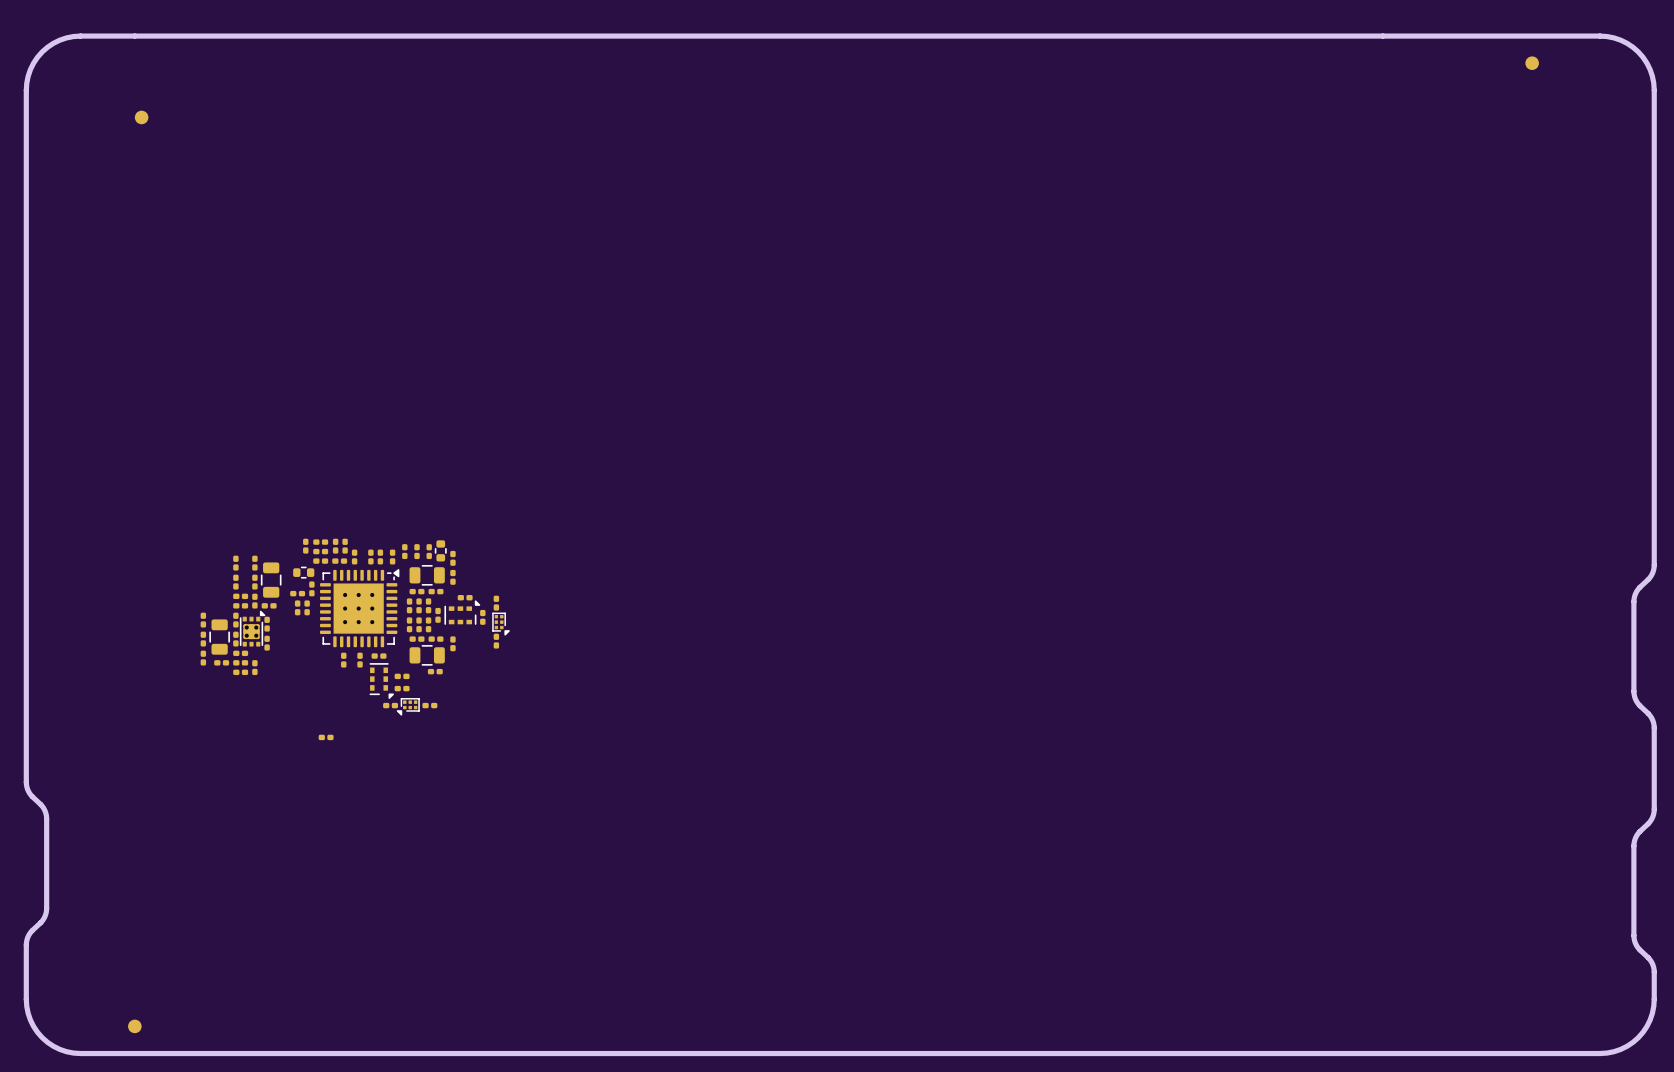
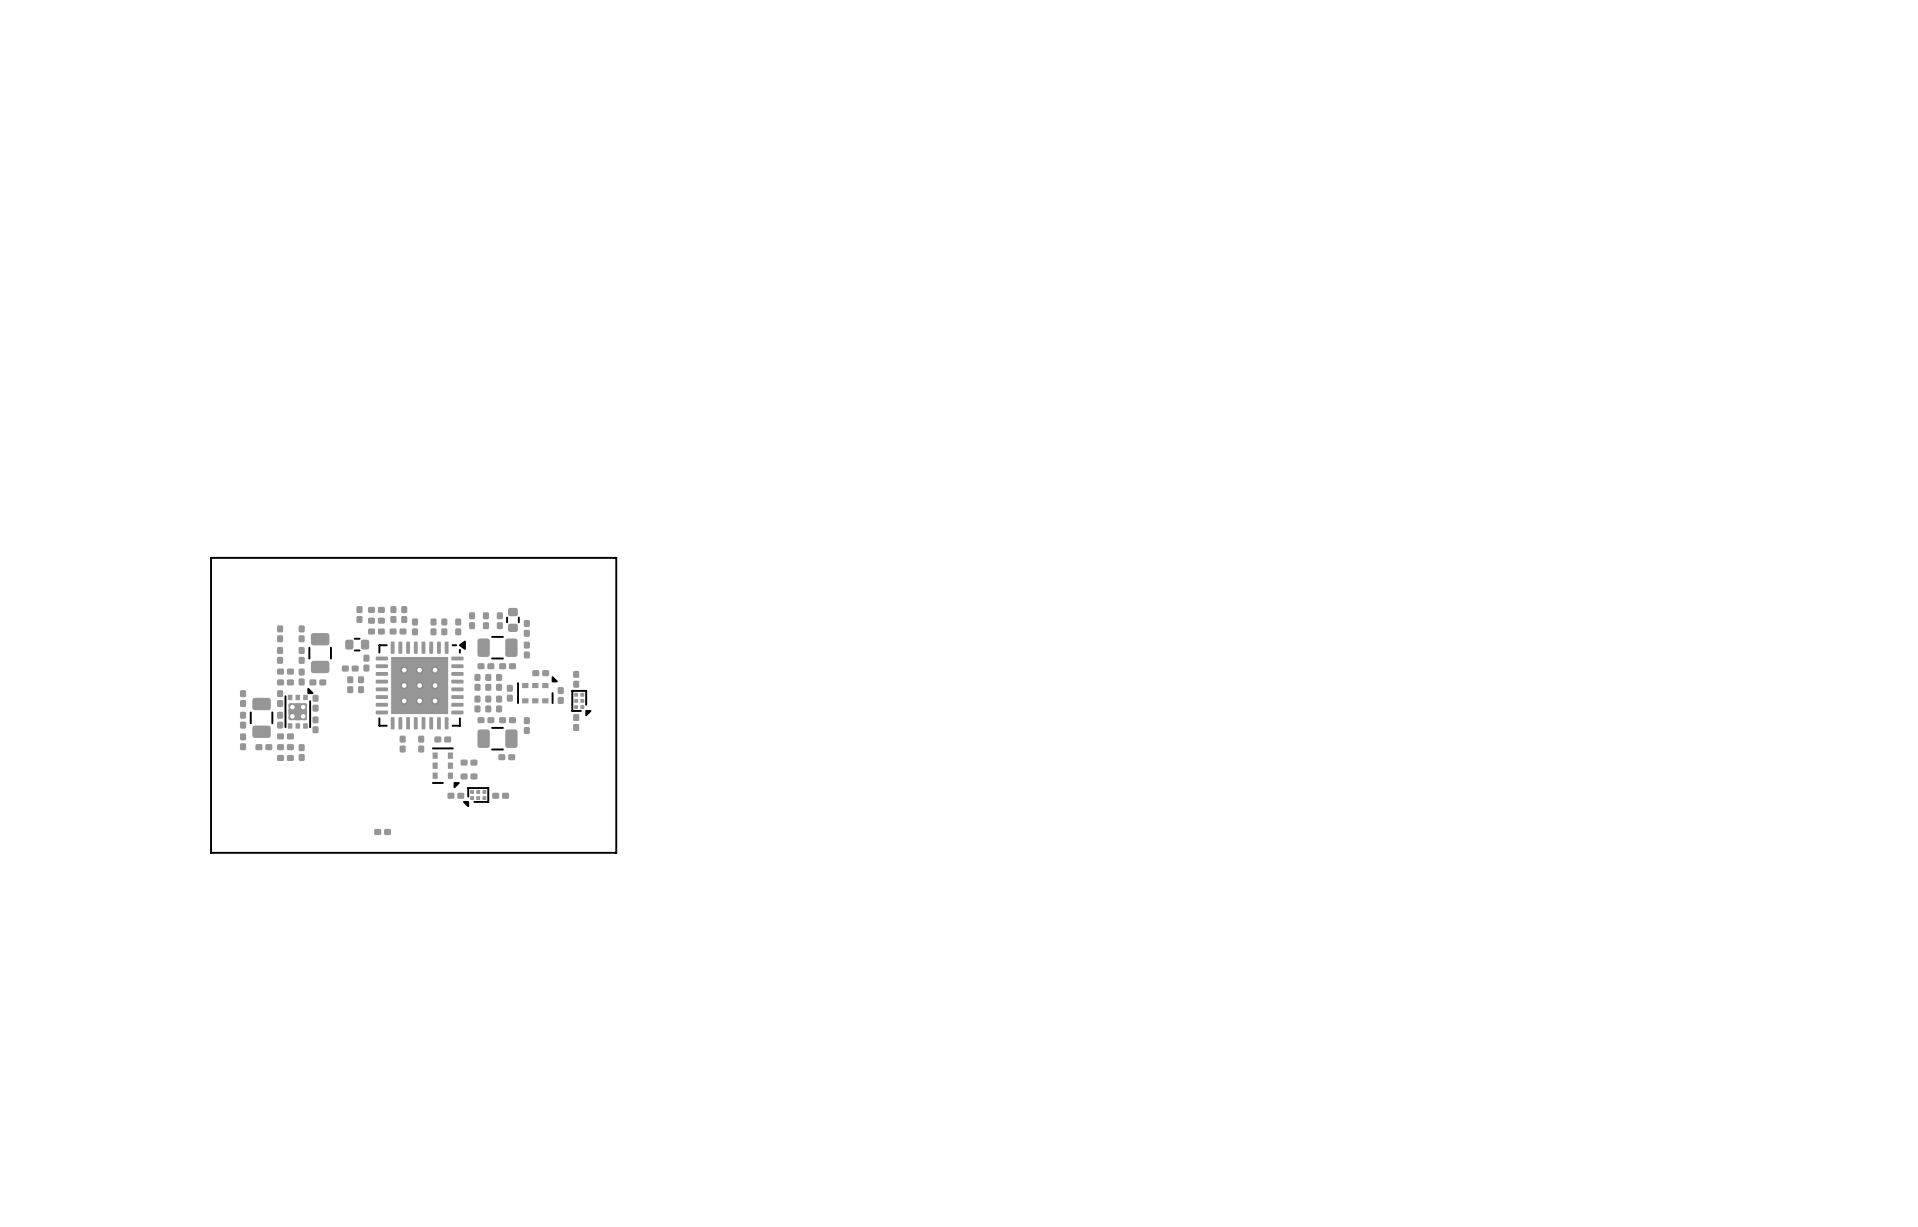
board edge: (80, 36) (1599, 36) (1614, 37) (1627, 43) (1638, 51) (1646, 63) (1652, 76) (1654, 90) (1654, 565) (1651, 575) (1636, 591) (1633, 601) (1634, 693) (1638, 703) (1651, 717) (1654, 727) (1654, 812) (1650, 821) (1636, 835) (1633, 845) (1634, 938) (1638, 947) (1651, 961) (1654, 969) (1653, 1006) (1646, 1026) (1638, 1037) (1627, 1046) (1614, 1051) (1599, 1053) (80, 1053) (66, 1051) (53, 1046) (42, 1037) (33, 1026) (28, 1013) (26, 999) (27, 939) (30, 932) (43, 918) (46, 908) (46, 816) (42, 806) (29, 792) (26, 782) (26, 90) (30, 69) (42, 51) (59, 40) (80, 36) -> none
part: (1532, 63) -> none
part: (141, 117) -> none
board edge: none -> (211, 557) (211, 852) (616, 852) (616, 557) (211, 557)
part: (134, 1026) -> none

